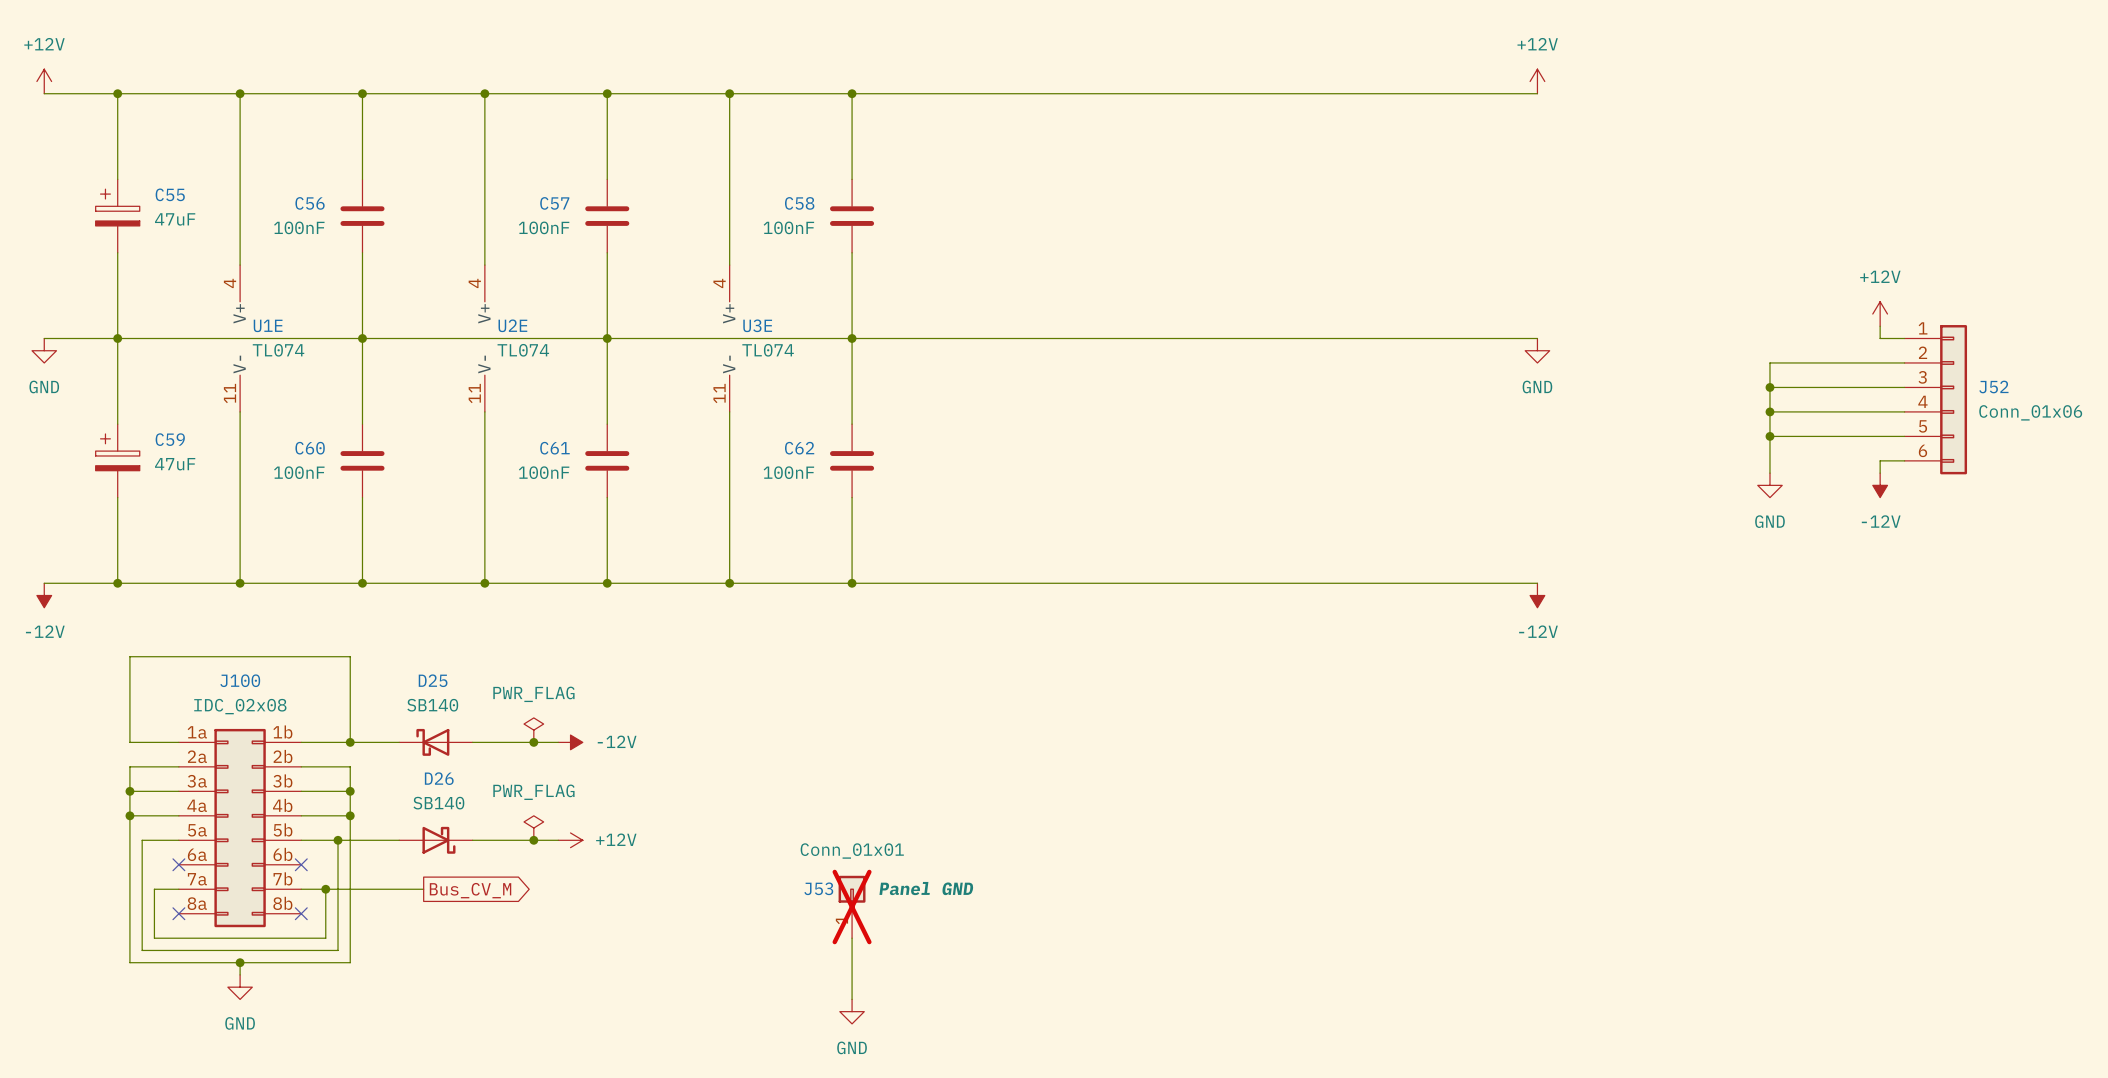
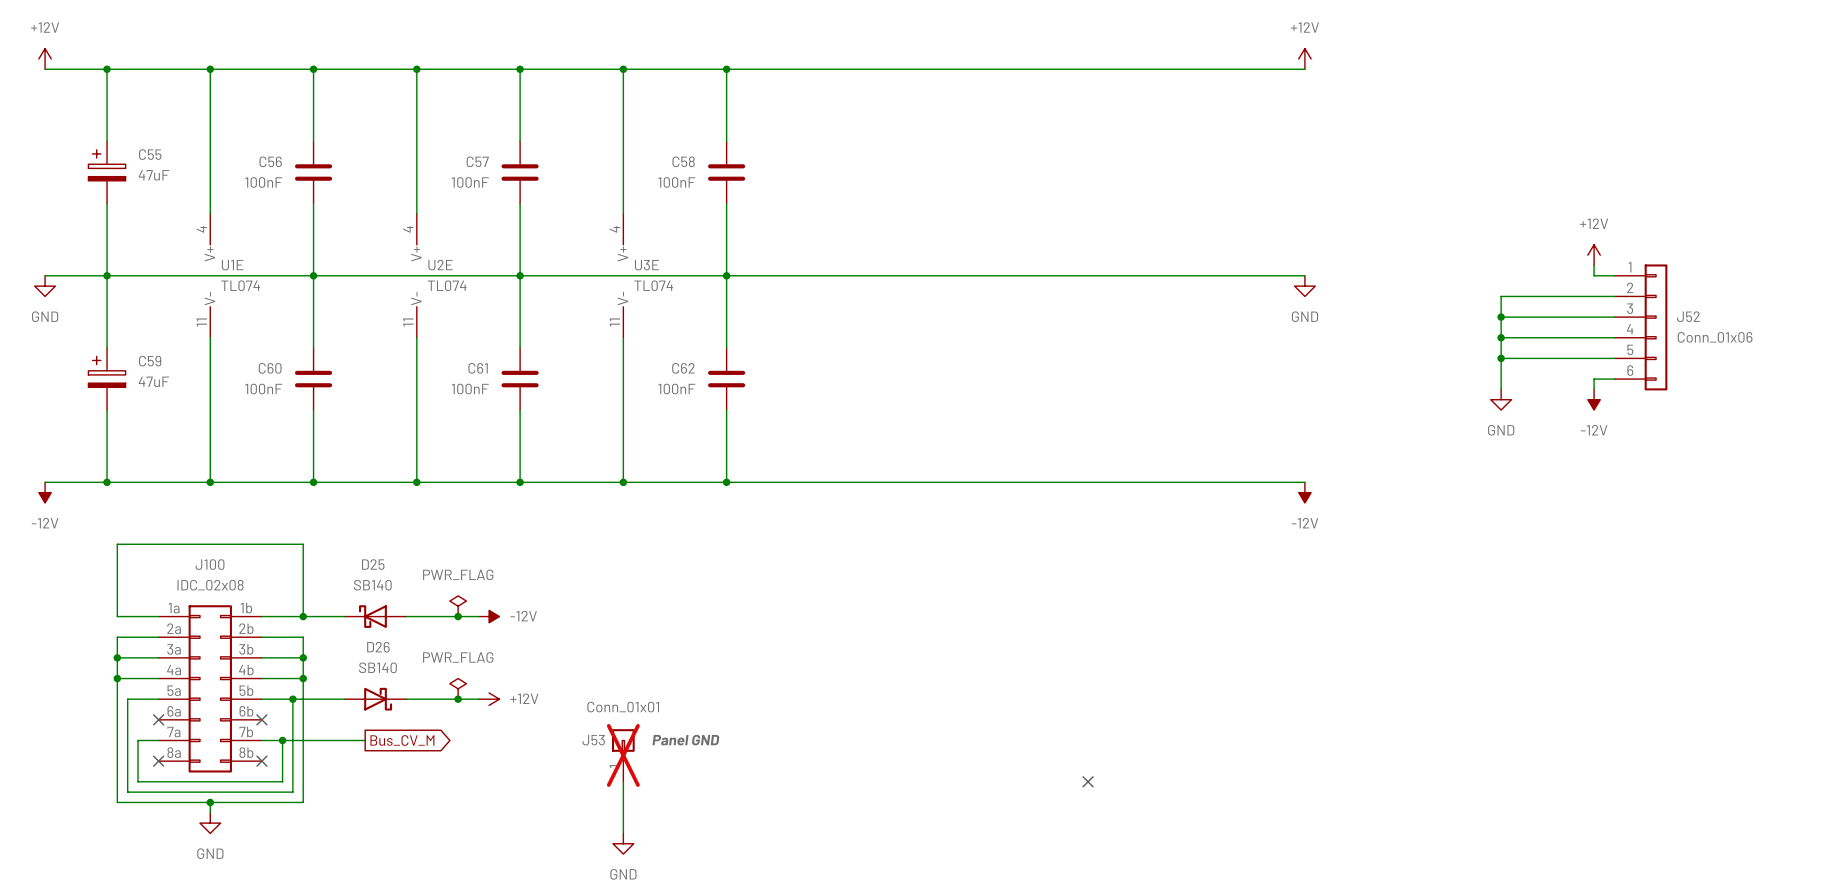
J53 position: (852, 907) -> (623, 755)
wire: (852, 938) (852, 999) -> (623, 781) (623, 833)
no-connect mark: none -> (1088, 781)
power symbol position: GND (852, 1011) -> GND (623, 843)

